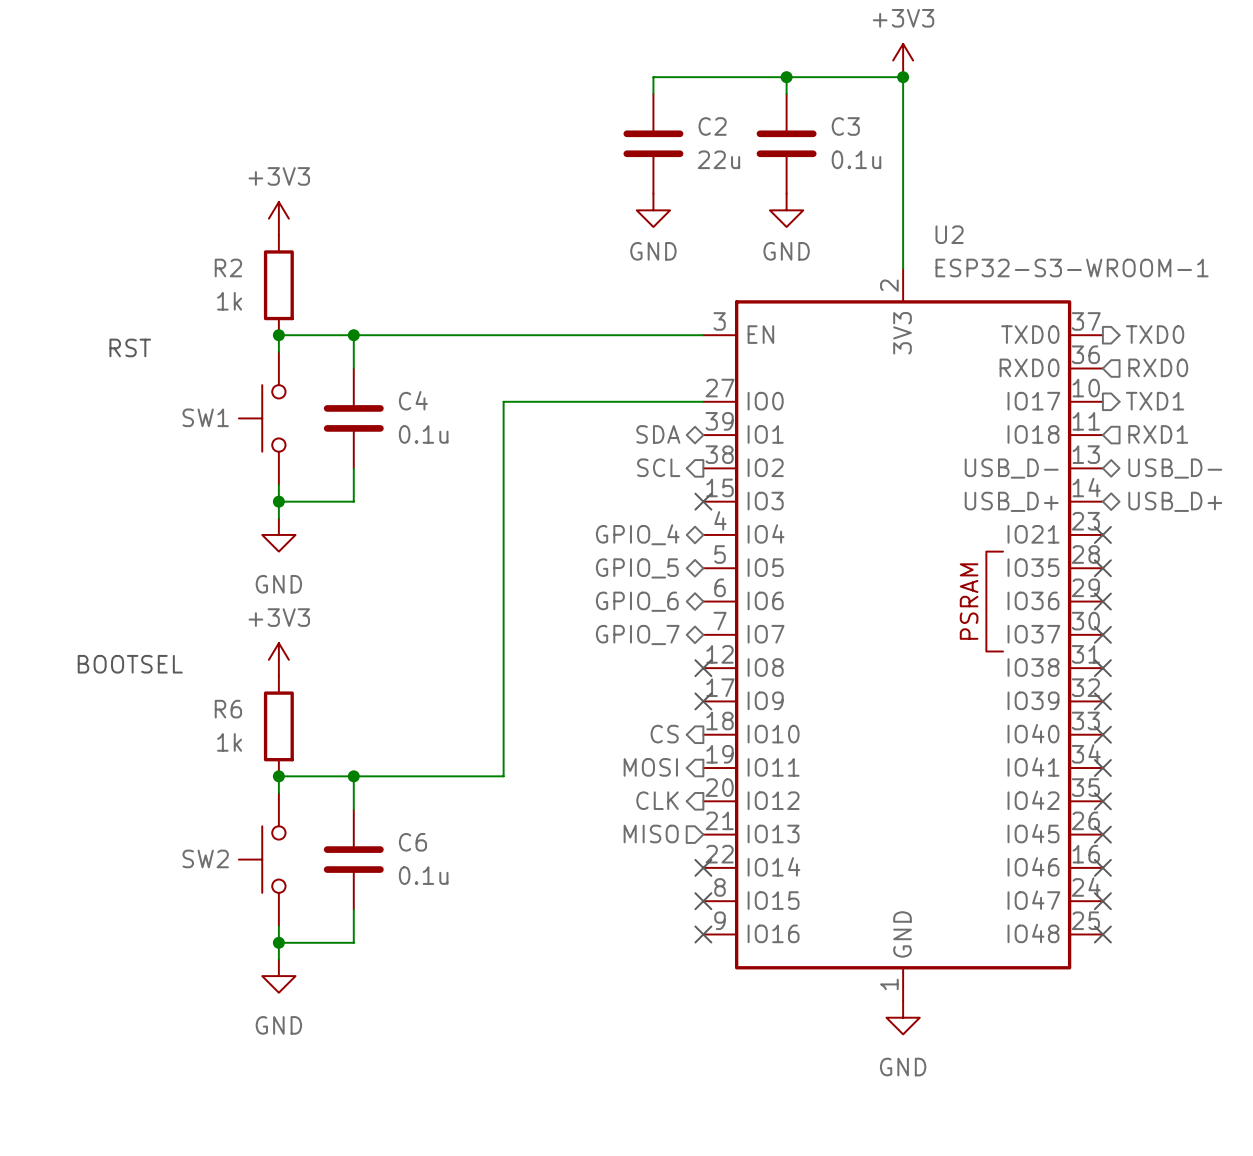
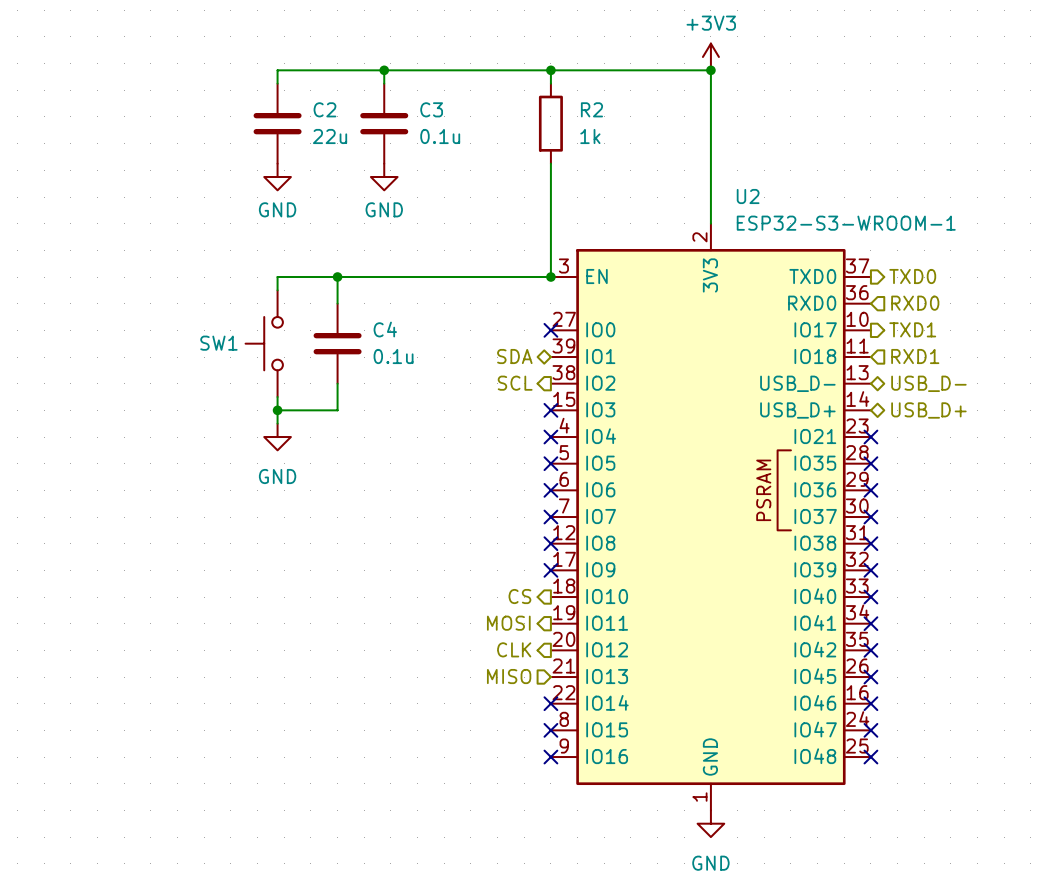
wire: none -> (384, 70) (384, 83)
junction: none -> (384, 70)
wire: (653, 77) (653, 93) -> (510, 70) (277, 70) (277, 83)
junction: none -> (550, 70)
wire: (786, 77) (786, 93) -> (550, 70) (550, 83)
junction: (786, 77) -> none
C2 position: (653, 143) -> (277, 123)
C3 position: (786, 143) -> (384, 123)
wire: none -> (550, 163) (550, 277)
power symbol: none -> GND (277, 176)
power symbol: none -> GND (384, 176)
power symbol: GND (653, 210) -> none
power symbol: GND (786, 210) -> none
power symbol: +3V3 (278, 218) -> none
R2 name position: R2 (228, 267) -> R2 (591, 109)
R2 position: (278, 285) -> (550, 123)
R2 value position: 1k (229, 301) -> 1k (590, 136)
junction: (278, 335) -> none
wire: (353, 335) (353, 368) -> (337, 277) (337, 303)
junction: (353, 335) -> none
wire: (362, 335) (278, 335) (278, 351) -> (277, 277) (277, 290)
junction: none -> (337, 277)
junction: none -> (550, 277)
text: RST (130, 347) -> none
wire: (703, 401) (503, 401) (503, 776) (278, 776) (278, 792) -> none
no-connect mark: none -> (550, 330)
SW1 position: (262, 418) -> (264, 343)
C4 position: (353, 418) -> (337, 343)
wire: (353, 468) (353, 501) (278, 501) -> (337, 383) (337, 410) (277, 410)
wire: (278, 485) (278, 518) -> (277, 397) (277, 423)
junction: (278, 501) -> none
junction: none -> (277, 410)
power symbol position: GND (278, 534) -> GND (277, 437)
hierarchical label: GPIO_4 (637, 534) -> none
no-connect mark: none -> (550, 437)
hierarchical label: GPIO_5 (637, 568) -> none
no-connect mark: none -> (550, 463)
hierarchical label: GPIO_6 (637, 601) -> none
no-connect mark: none -> (550, 490)
no-connect mark: none -> (550, 517)
hierarchical label: GPIO_7 (637, 635) -> none
power symbol: +3V3 (278, 659) -> none
text: BOOTSEL (130, 664) -> none
R6: 1k (278, 726) -> none
junction: (278, 776) -> none
wire: (353, 776) (353, 809) -> none
junction: (353, 776) -> none
SW2: (262, 859) -> none
C6: 0.1u (353, 859) -> none
wire: (353, 909) (353, 942) (278, 942) -> none
wire: (278, 926) (278, 959) -> none
junction: (278, 942) -> none
power symbol: GND (278, 976) -> none

